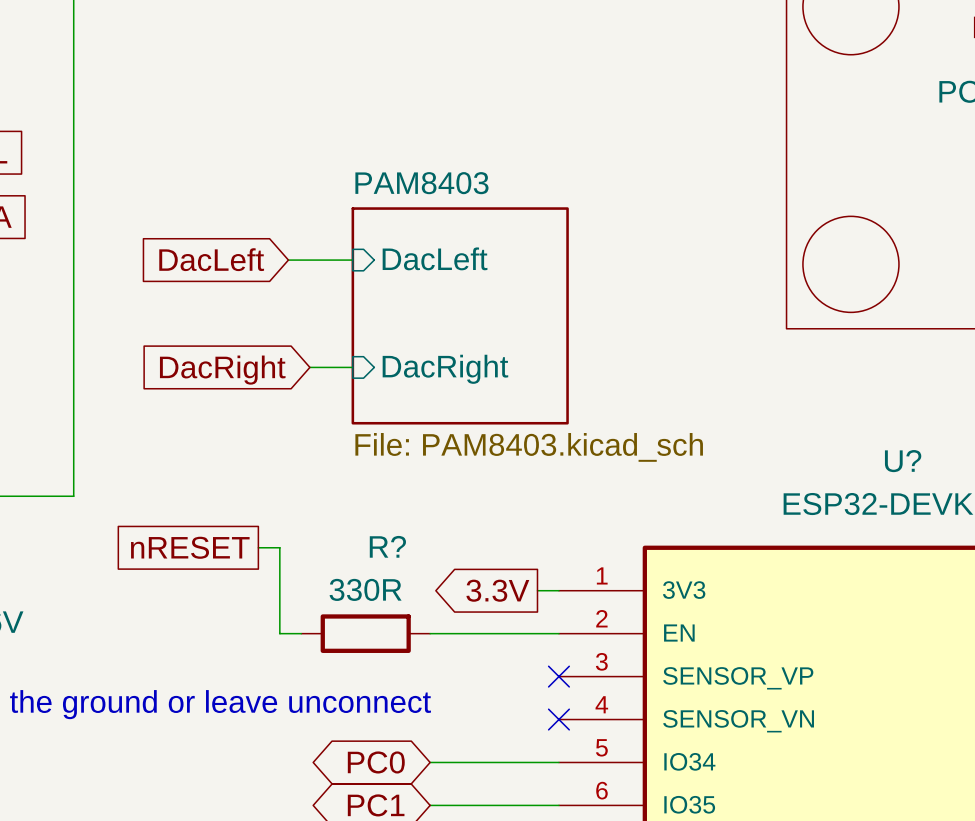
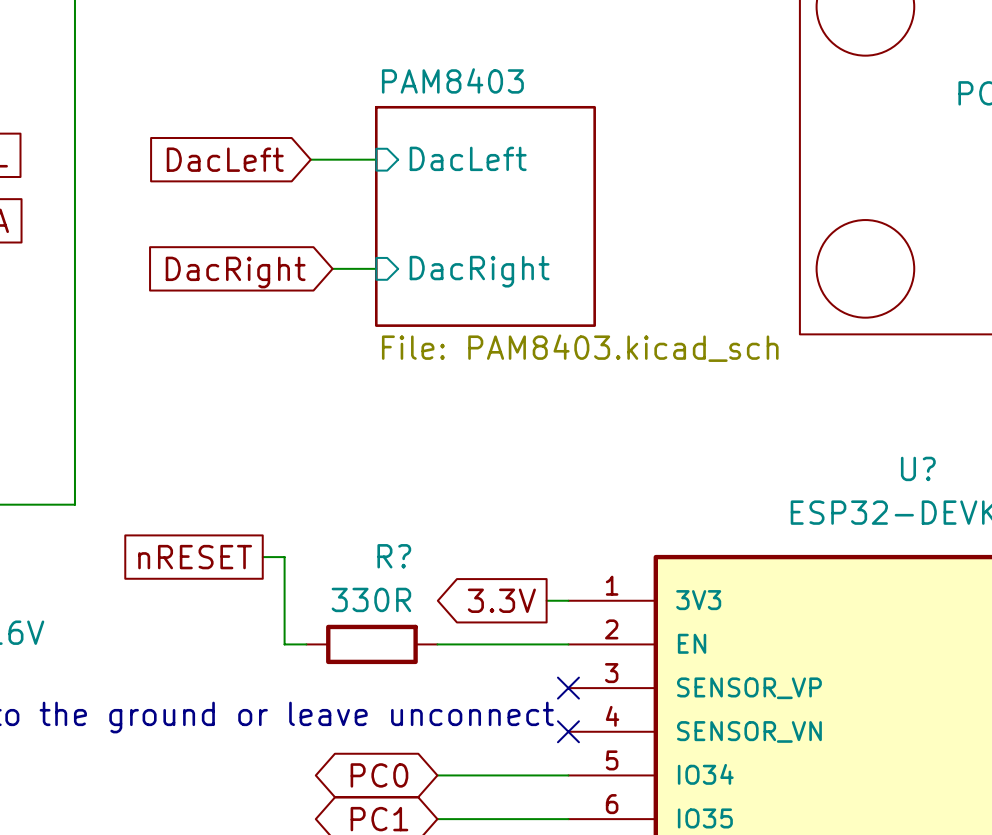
sheet pin position: DacLeft (435, 258) -> DacLeft (468, 158)
global label position: DacLeft (211, 259) -> DacLeft (225, 159)
wire: (288, 260) (352, 260) -> (310, 159) (376, 159)
sheet PAM8403 position: (460, 315) -> (485, 216)
wire: (309, 367) (352, 367) -> (332, 268) (376, 268)
sheet pin position: DacRight (445, 369) -> DacRight (479, 271)
global label position: DacRight (222, 370) -> DacRight (235, 272)

